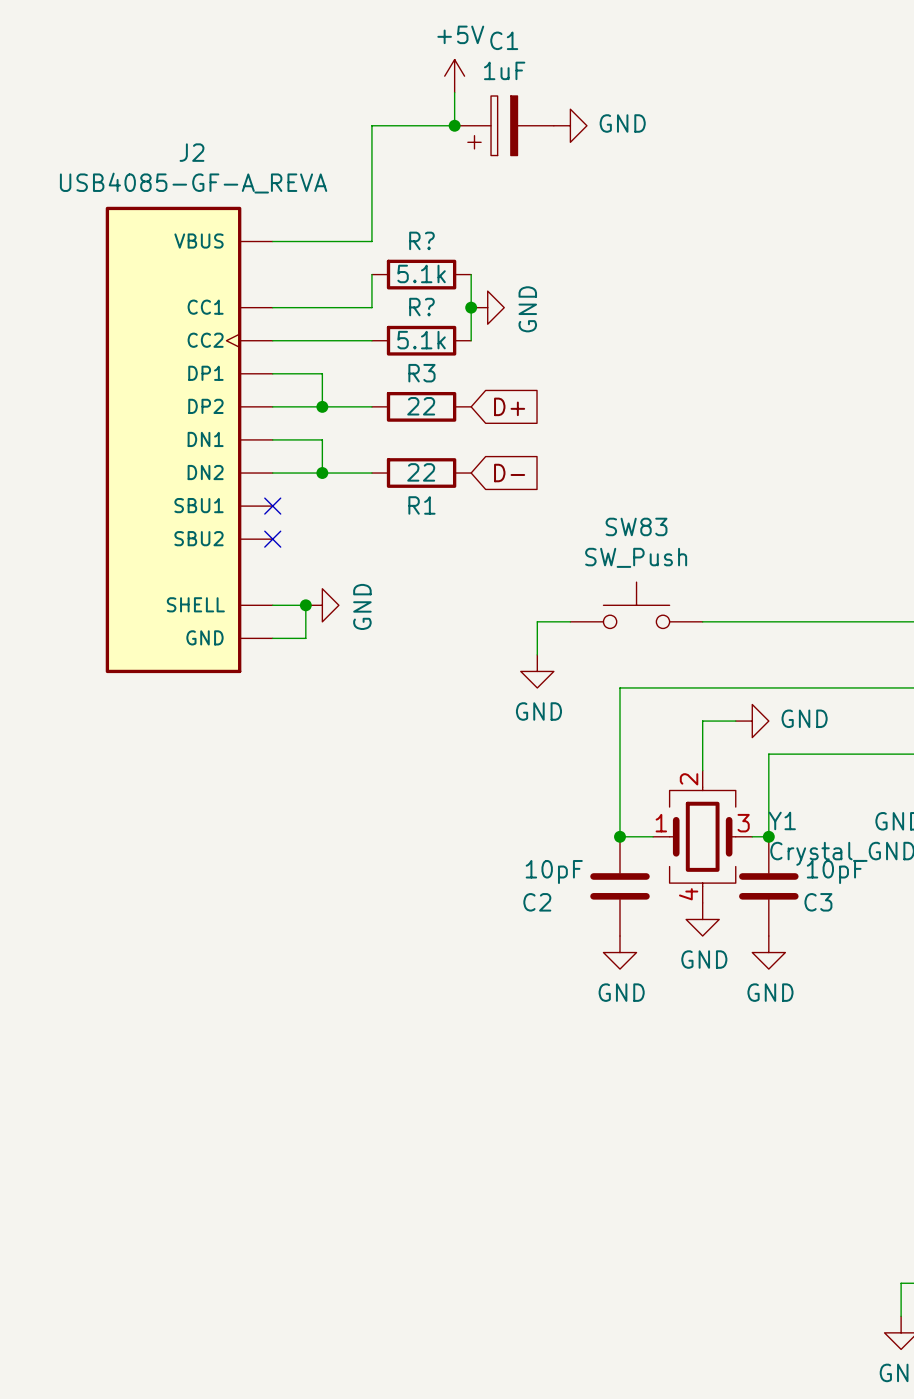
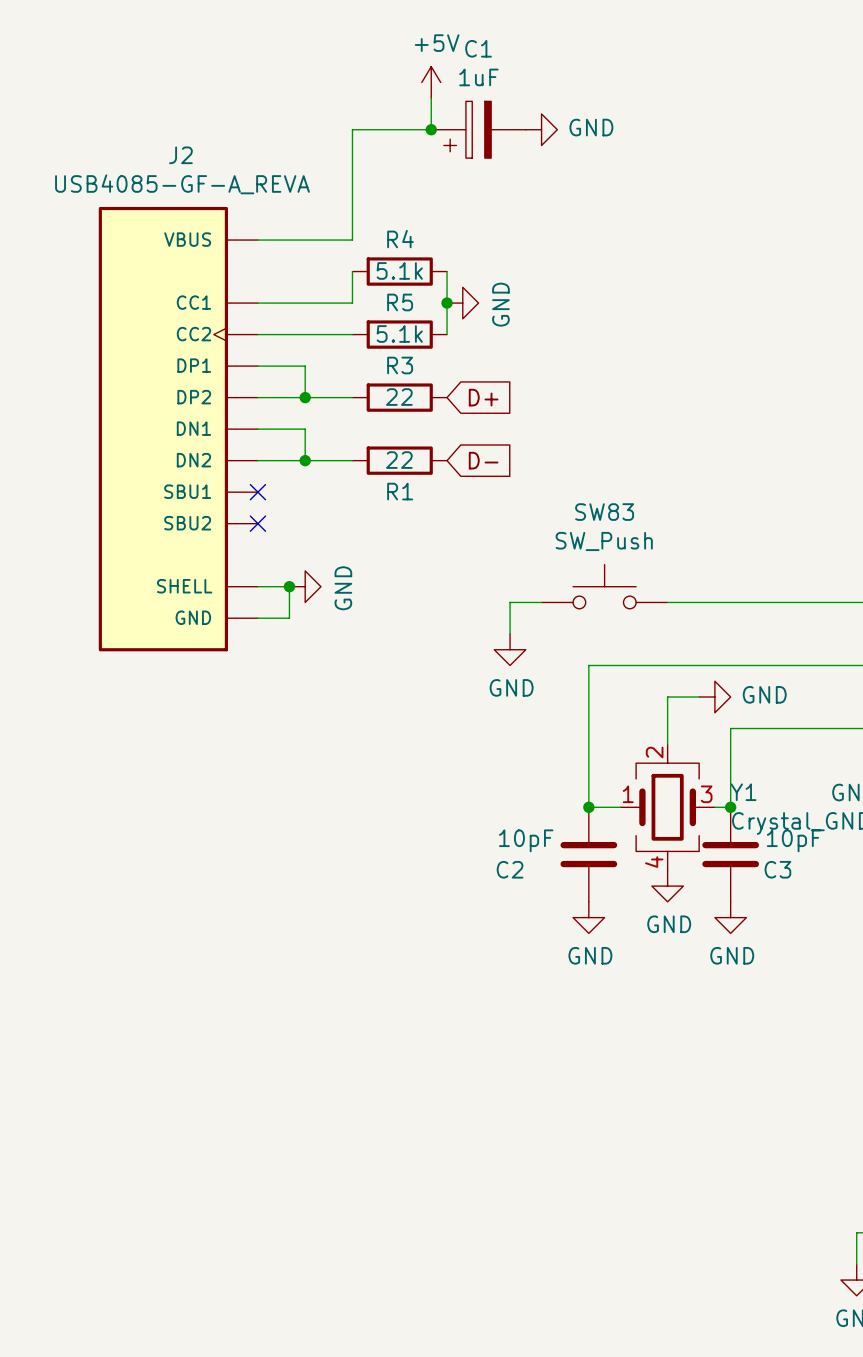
R? name: R? (421, 240) -> R4 (400, 239)
R? name: R? (421, 307) -> R5 (400, 302)

